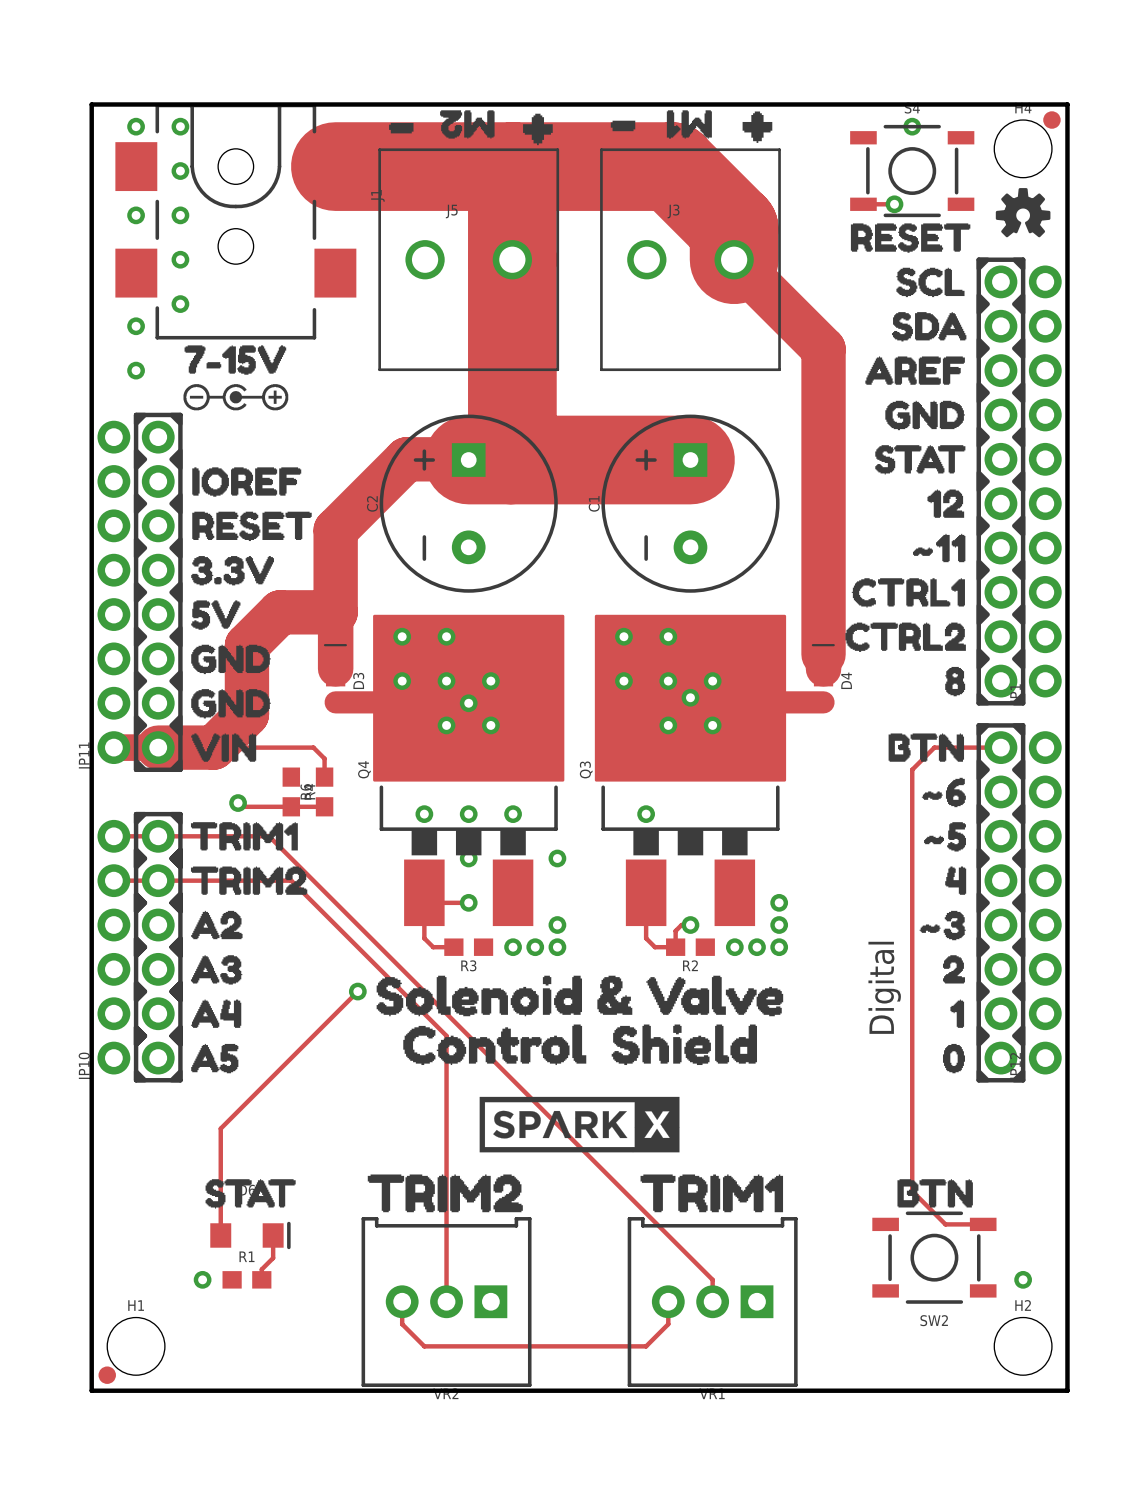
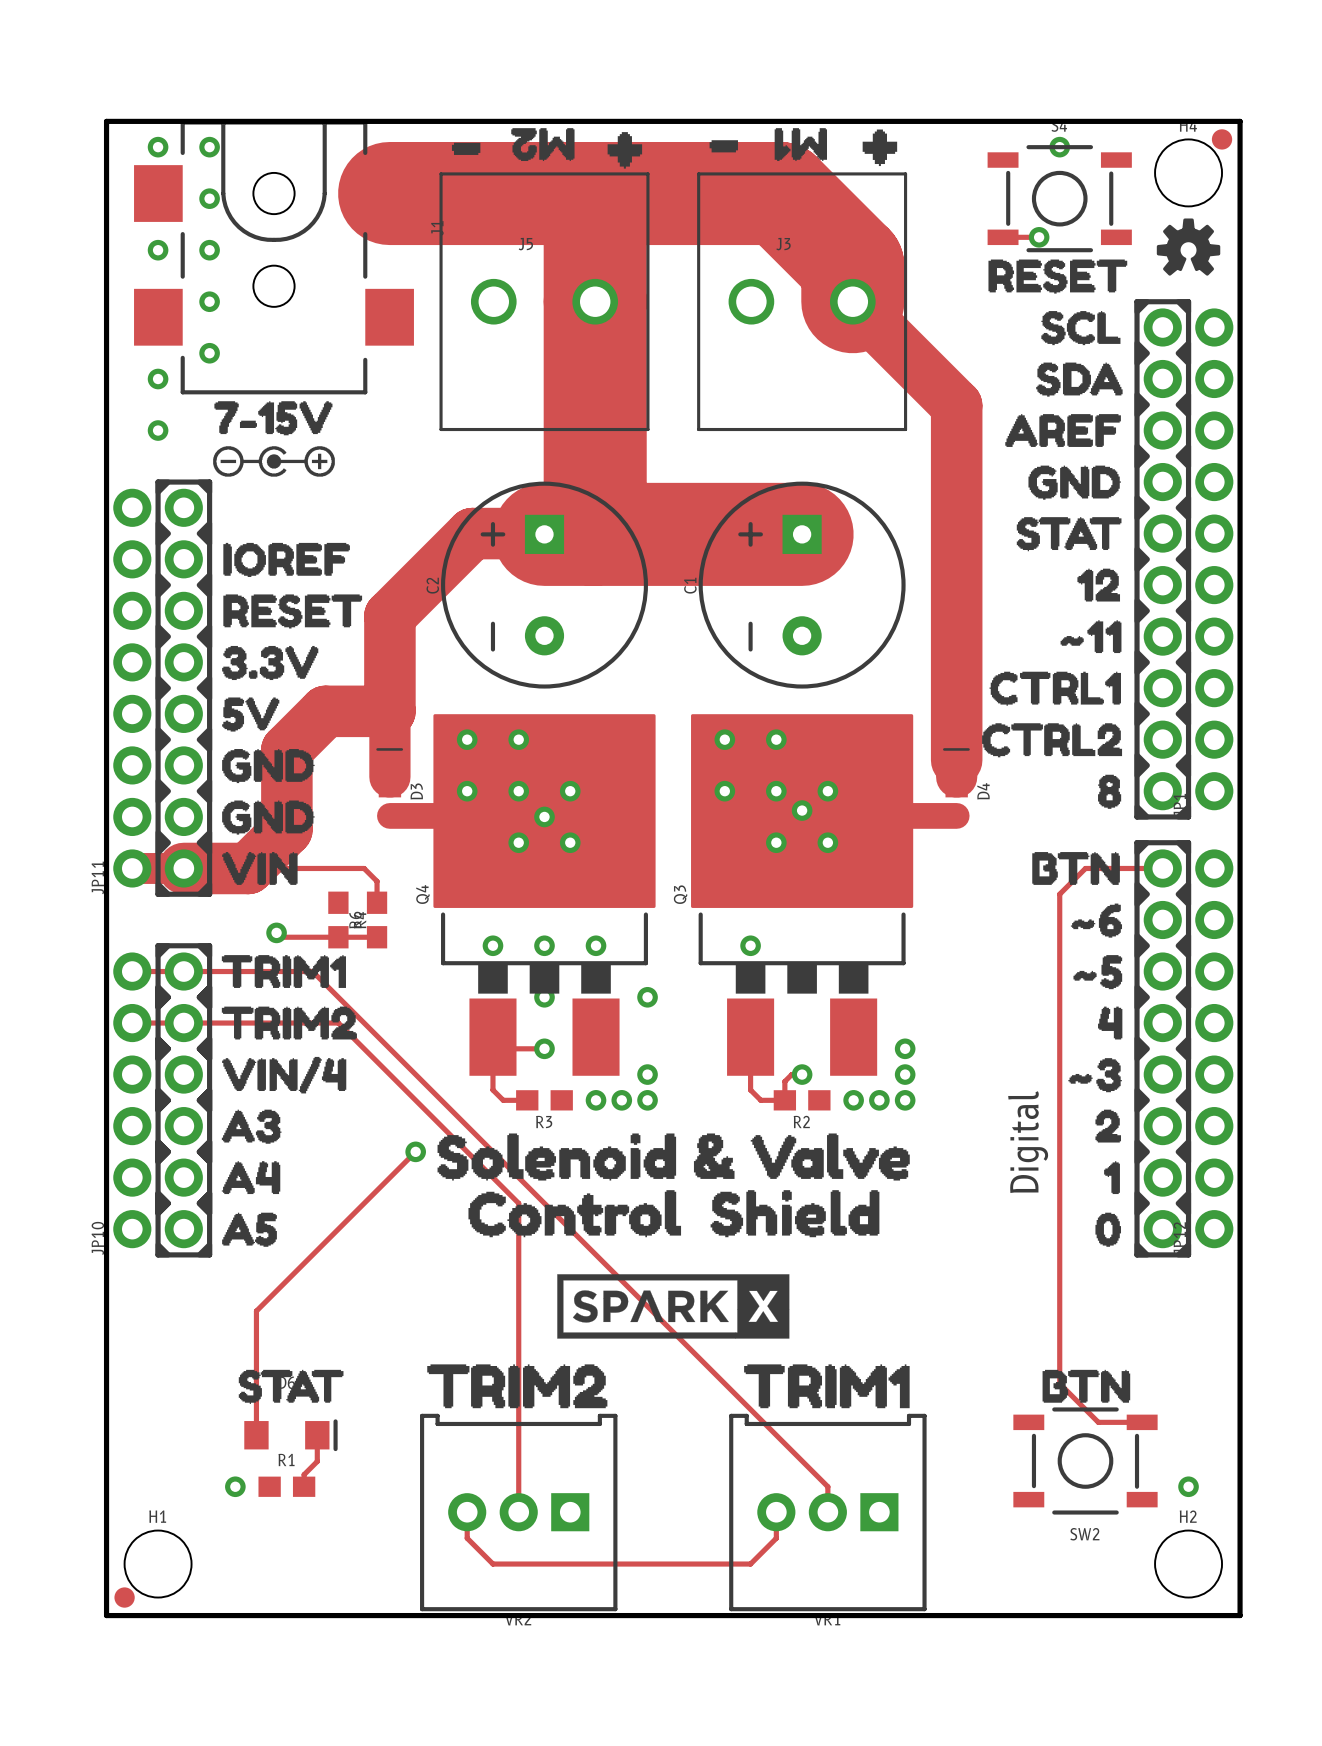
drawing: none -> [222, 1056, 347, 1094]
drawing: [191, 910, 243, 940] -> none

